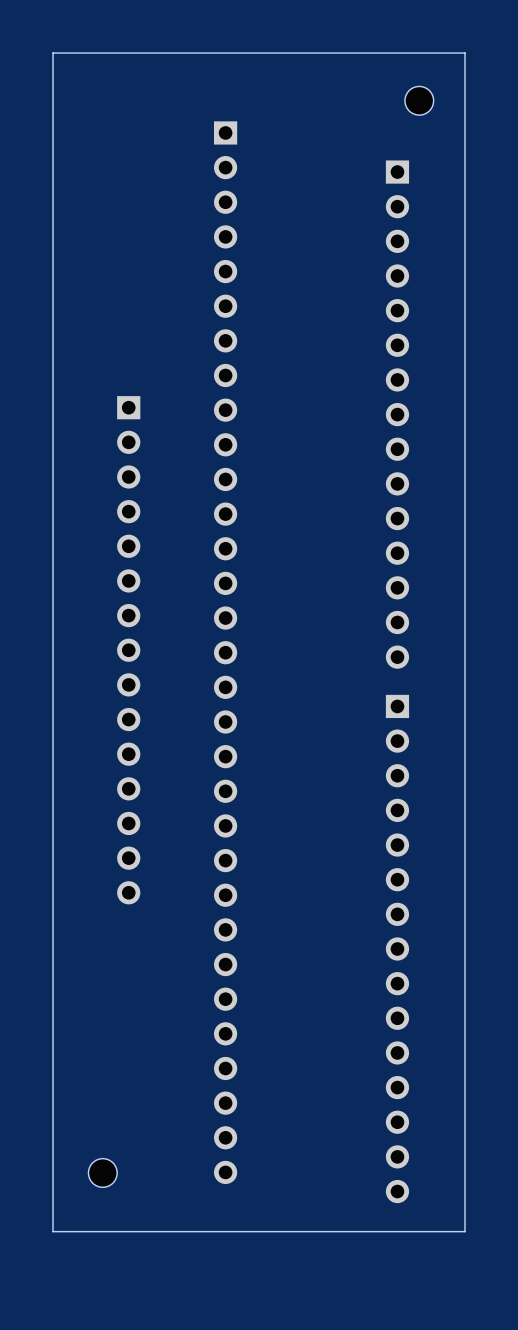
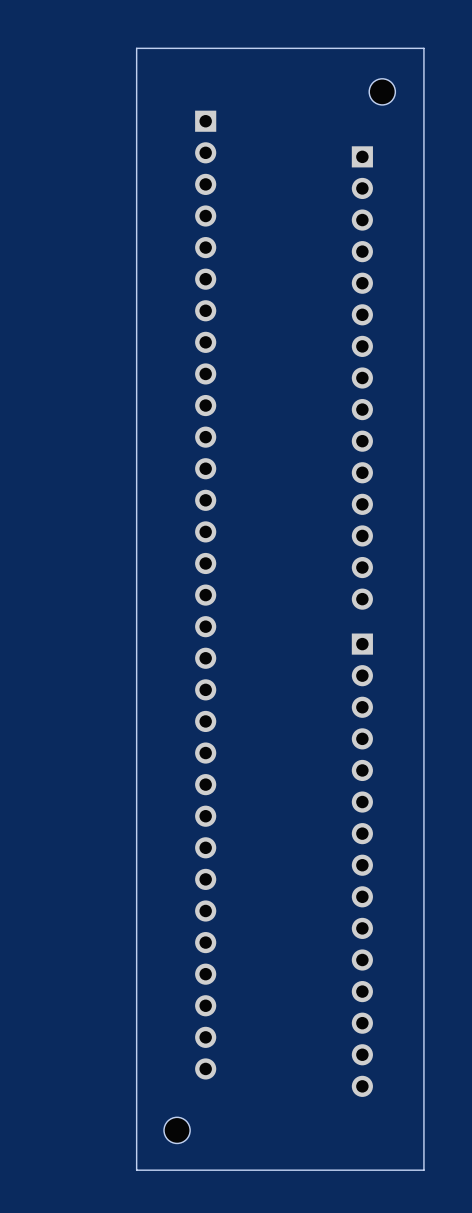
board edge: (149, 53) (53, 53) (53, 1231) (464, 1231) -> (136, 48) (136, 1170) (423, 1170) (423, 1122)
part: (128, 650) -> none
part position: (102, 1172) -> (177, 1130)

